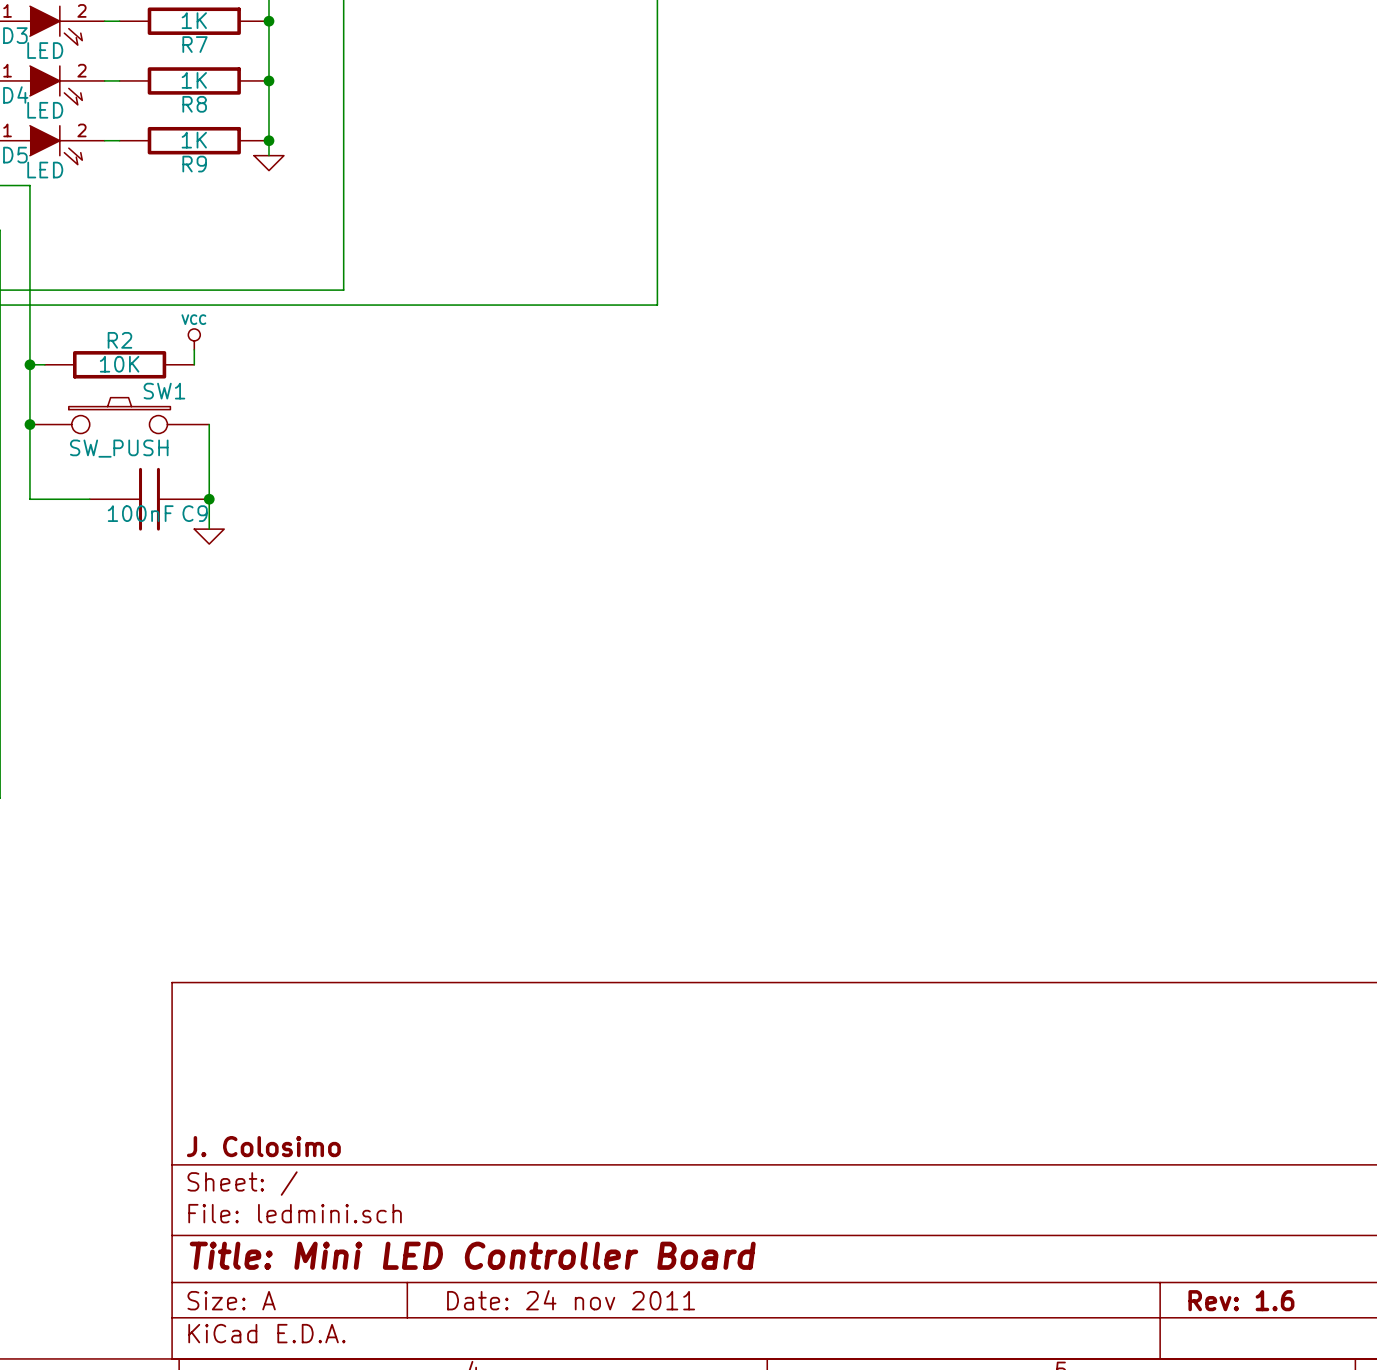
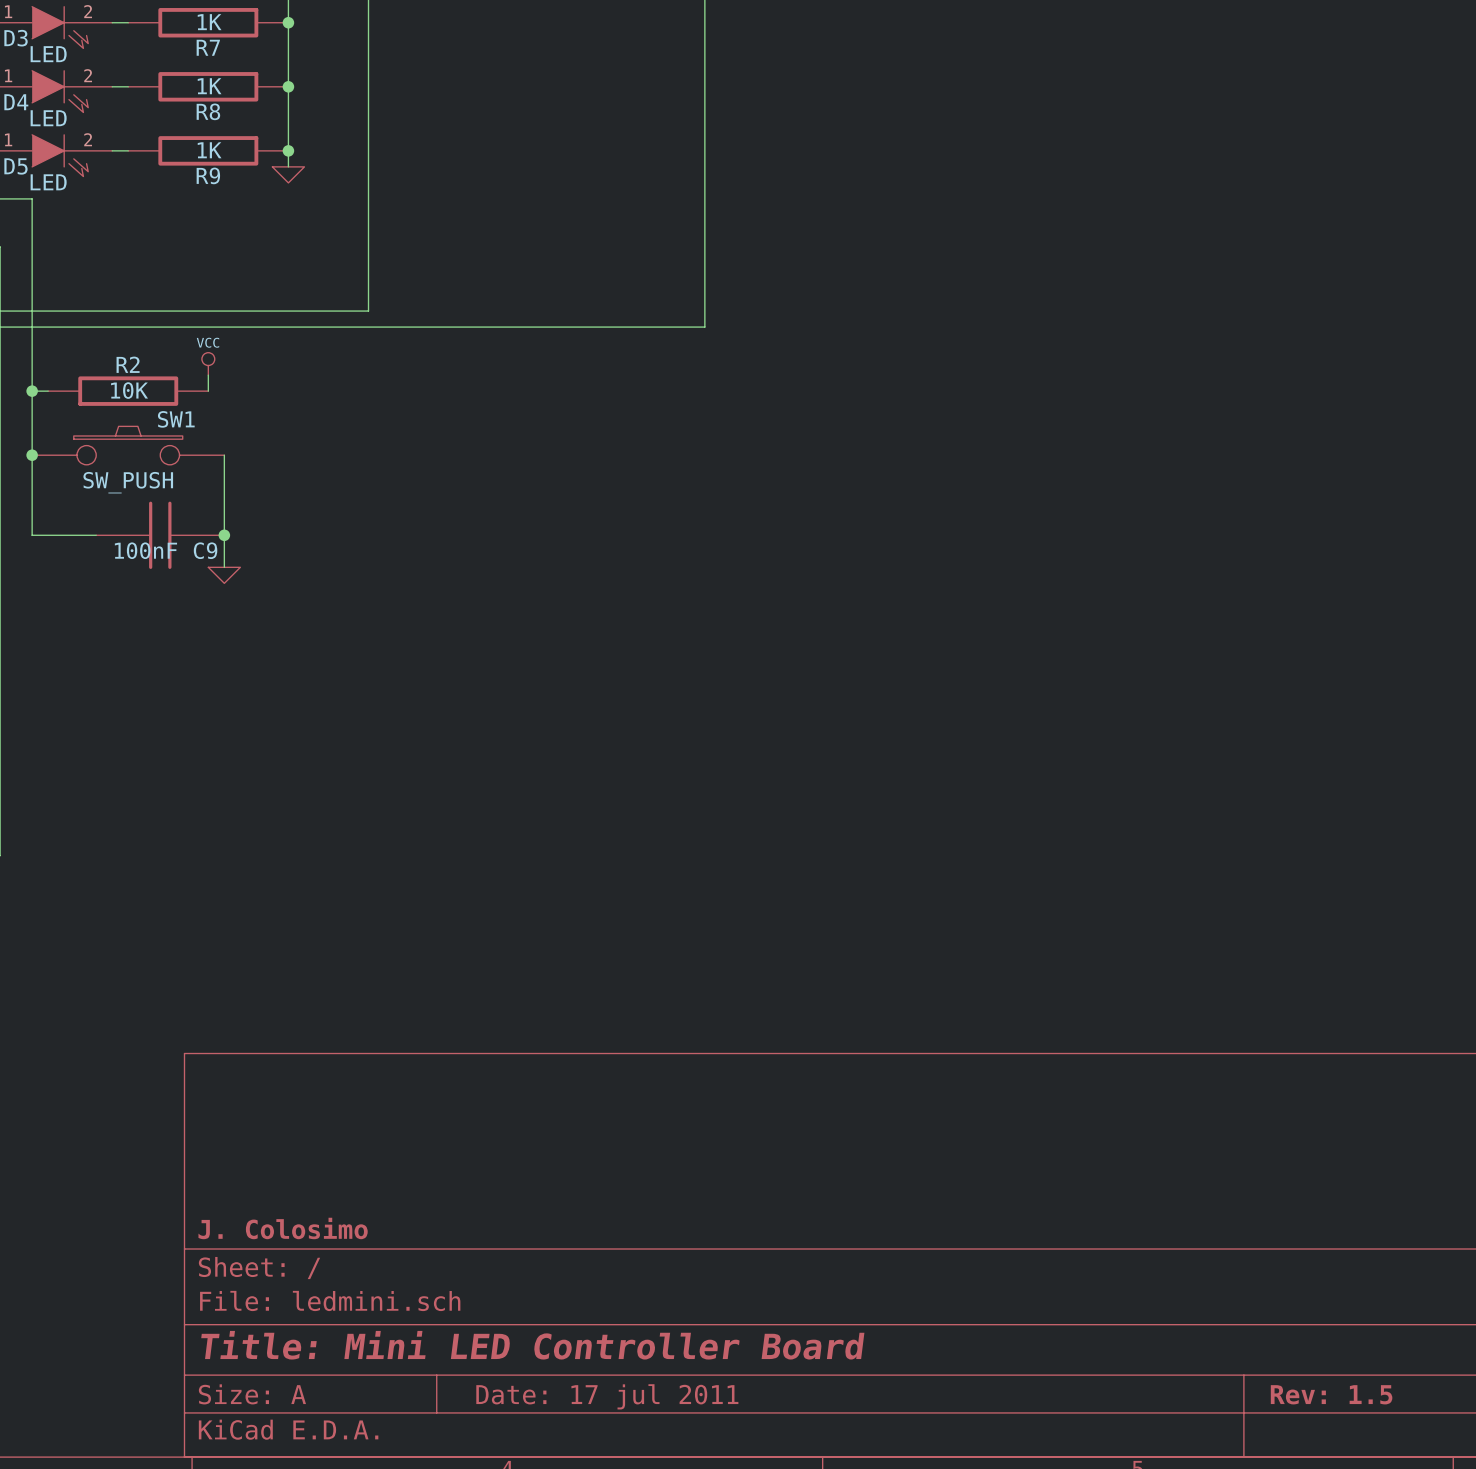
title block: Date: 24 nov 2011 (571, 1300) -> Date: 17 jul 2011 (607, 1396)
title block: Rev: 1.6 (1241, 1300) -> Rev: 1.5 (1331, 1394)

